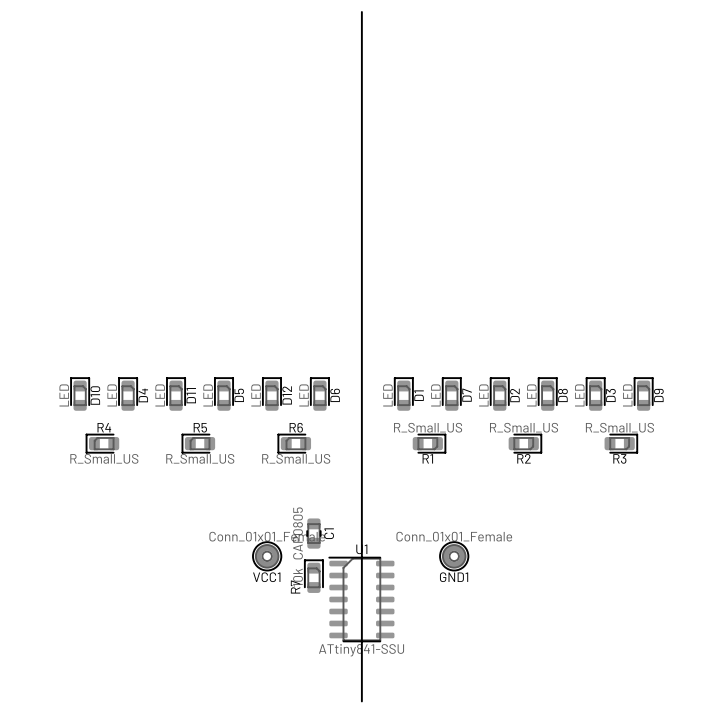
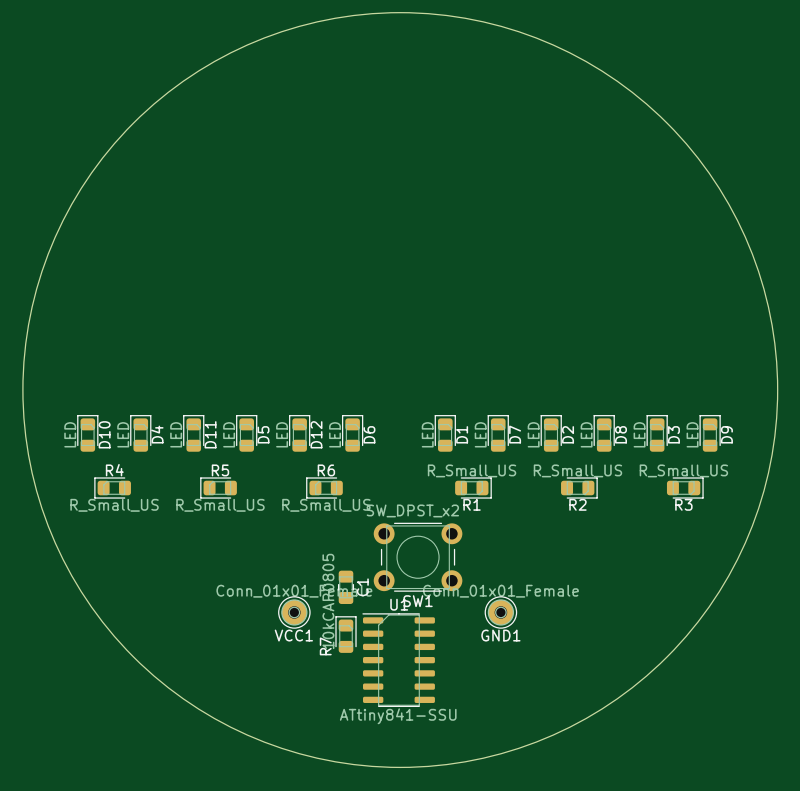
round board edge: none -> [22, 12, 779, 769]
line: (361, 12) (361, 701) -> none
SW1: none -> SW_DPST_x2 (418, 557)

